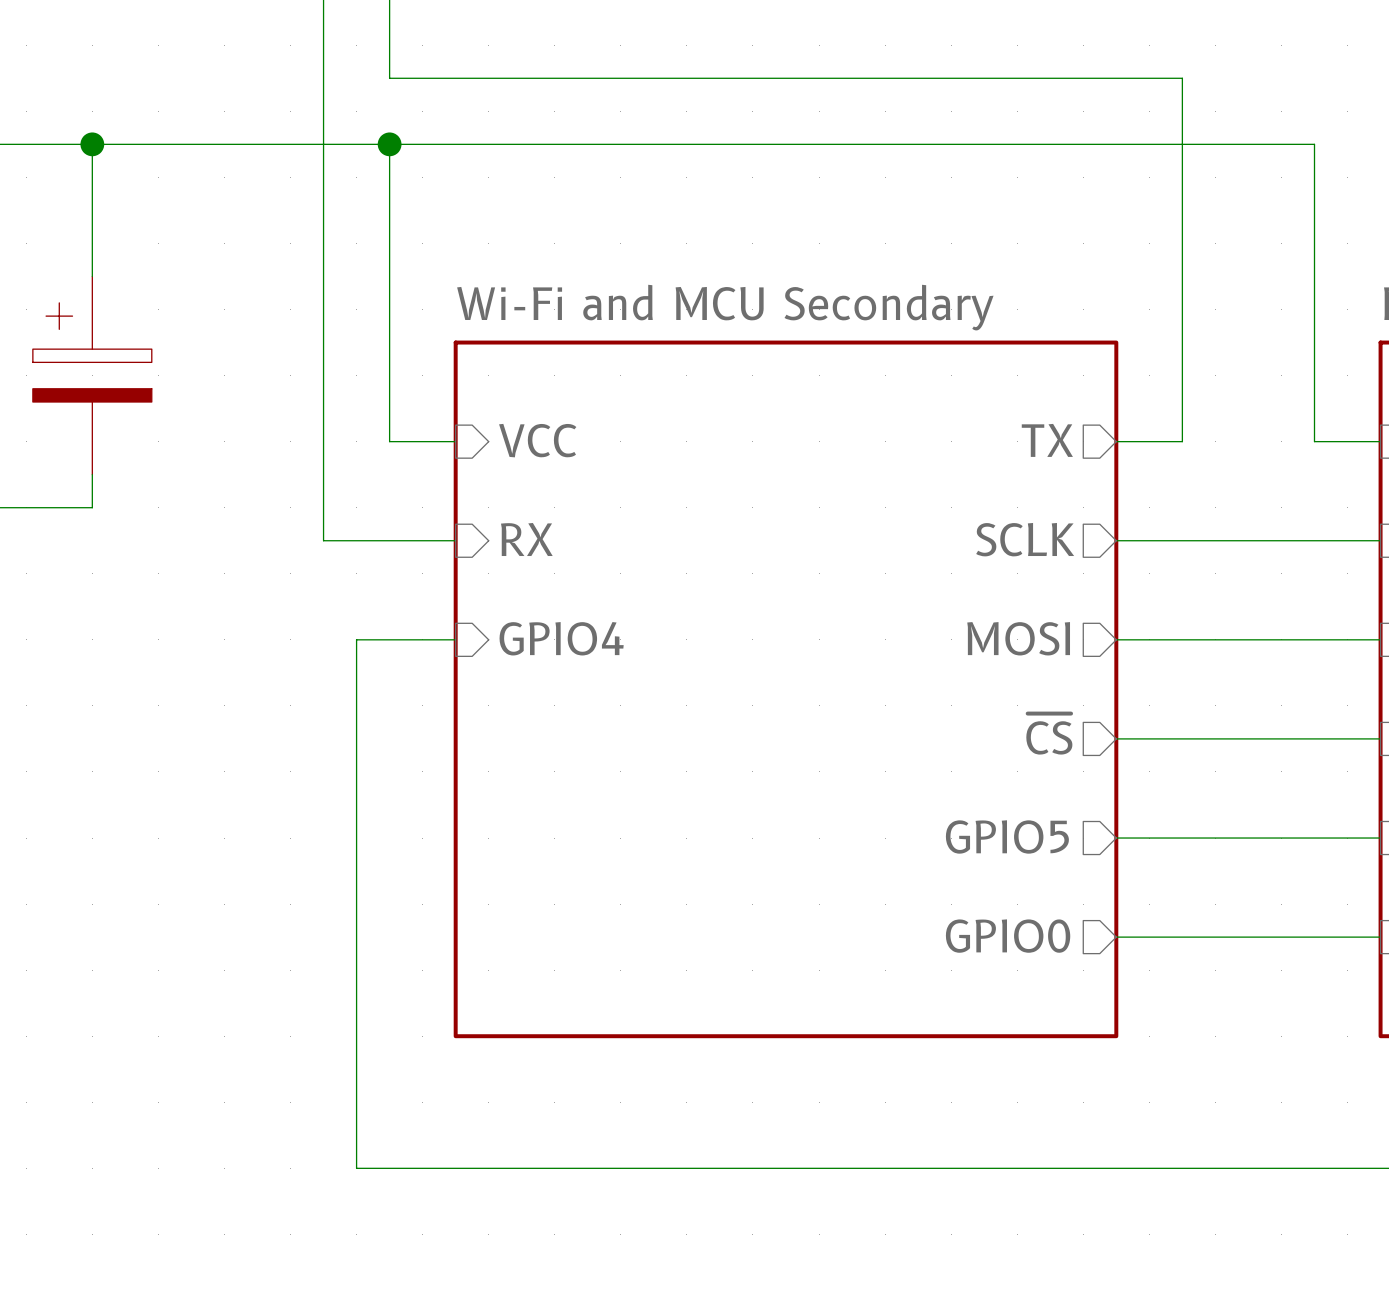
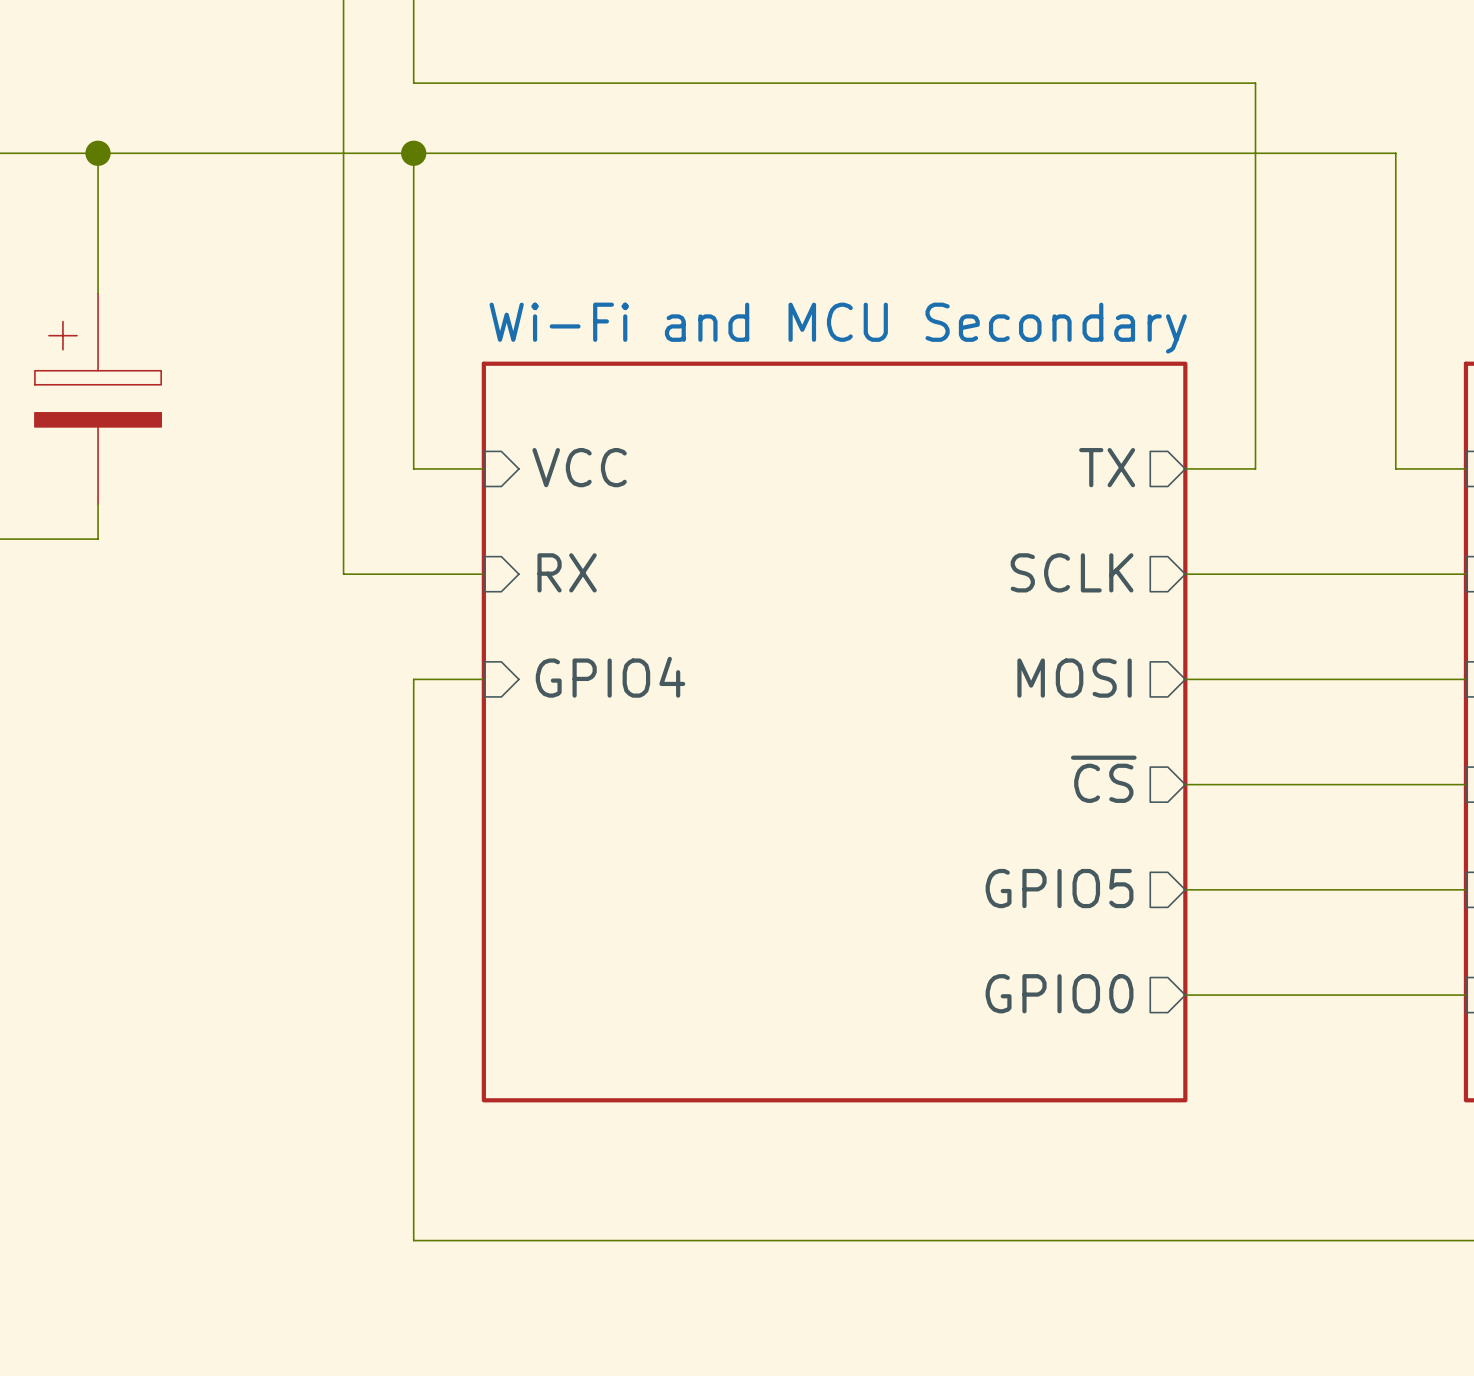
wire: (389, 639) (356, 639) (356, 1168) (389, 1168) -> (413, 679) (413, 1240)

